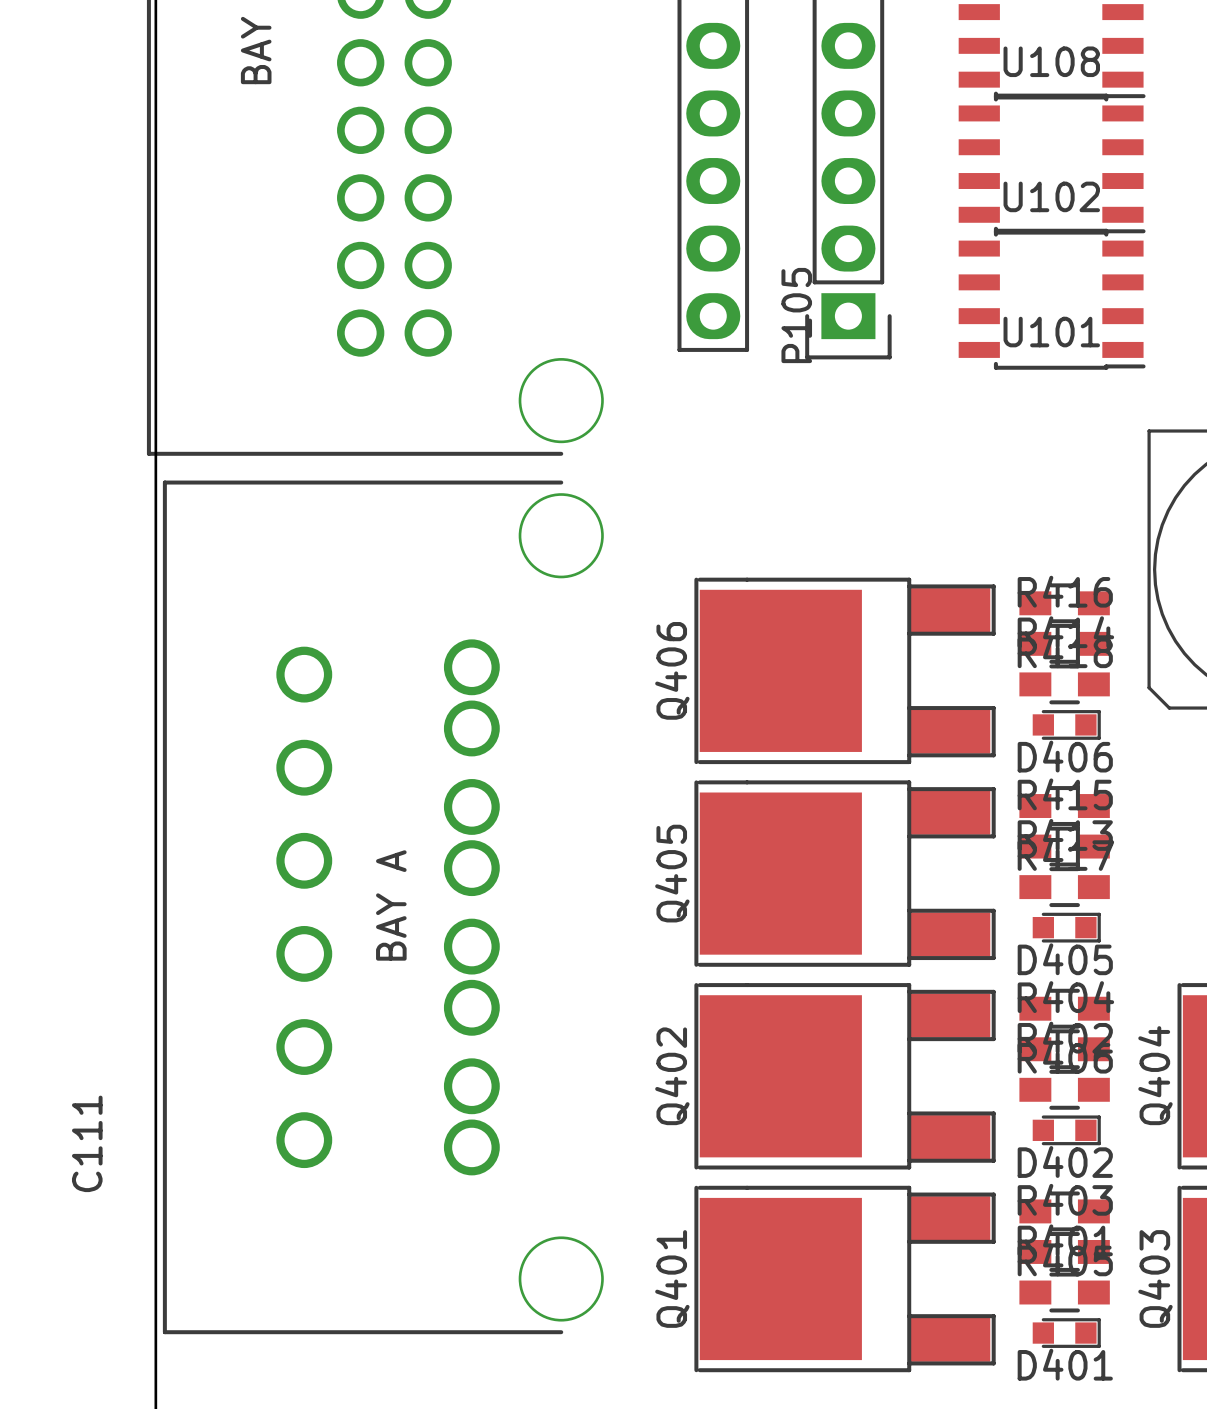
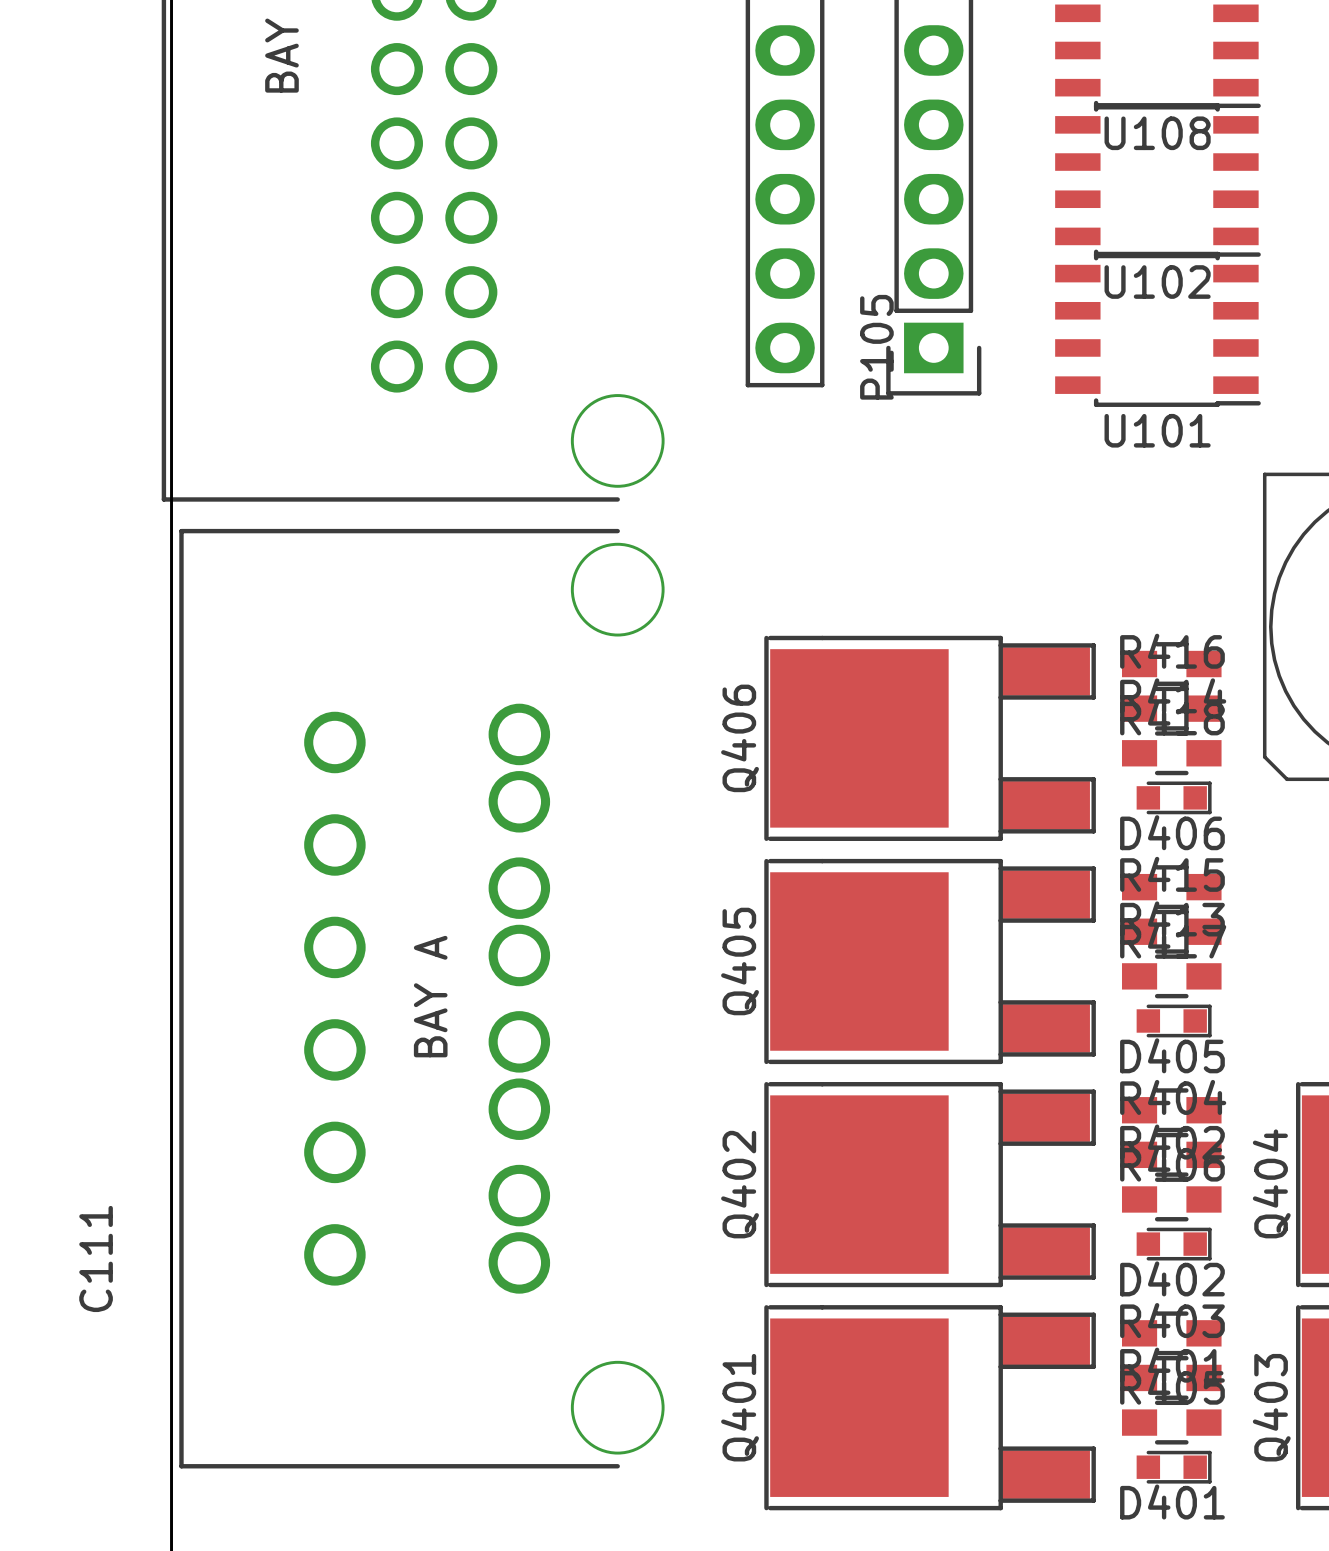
U108 name position: U108 (1051, 61) -> U108 (1157, 133)
U102 name position: U102 (1051, 196) -> U102 (1157, 282)
U101 name position: U101 (1051, 332) -> U101 (1157, 430)

